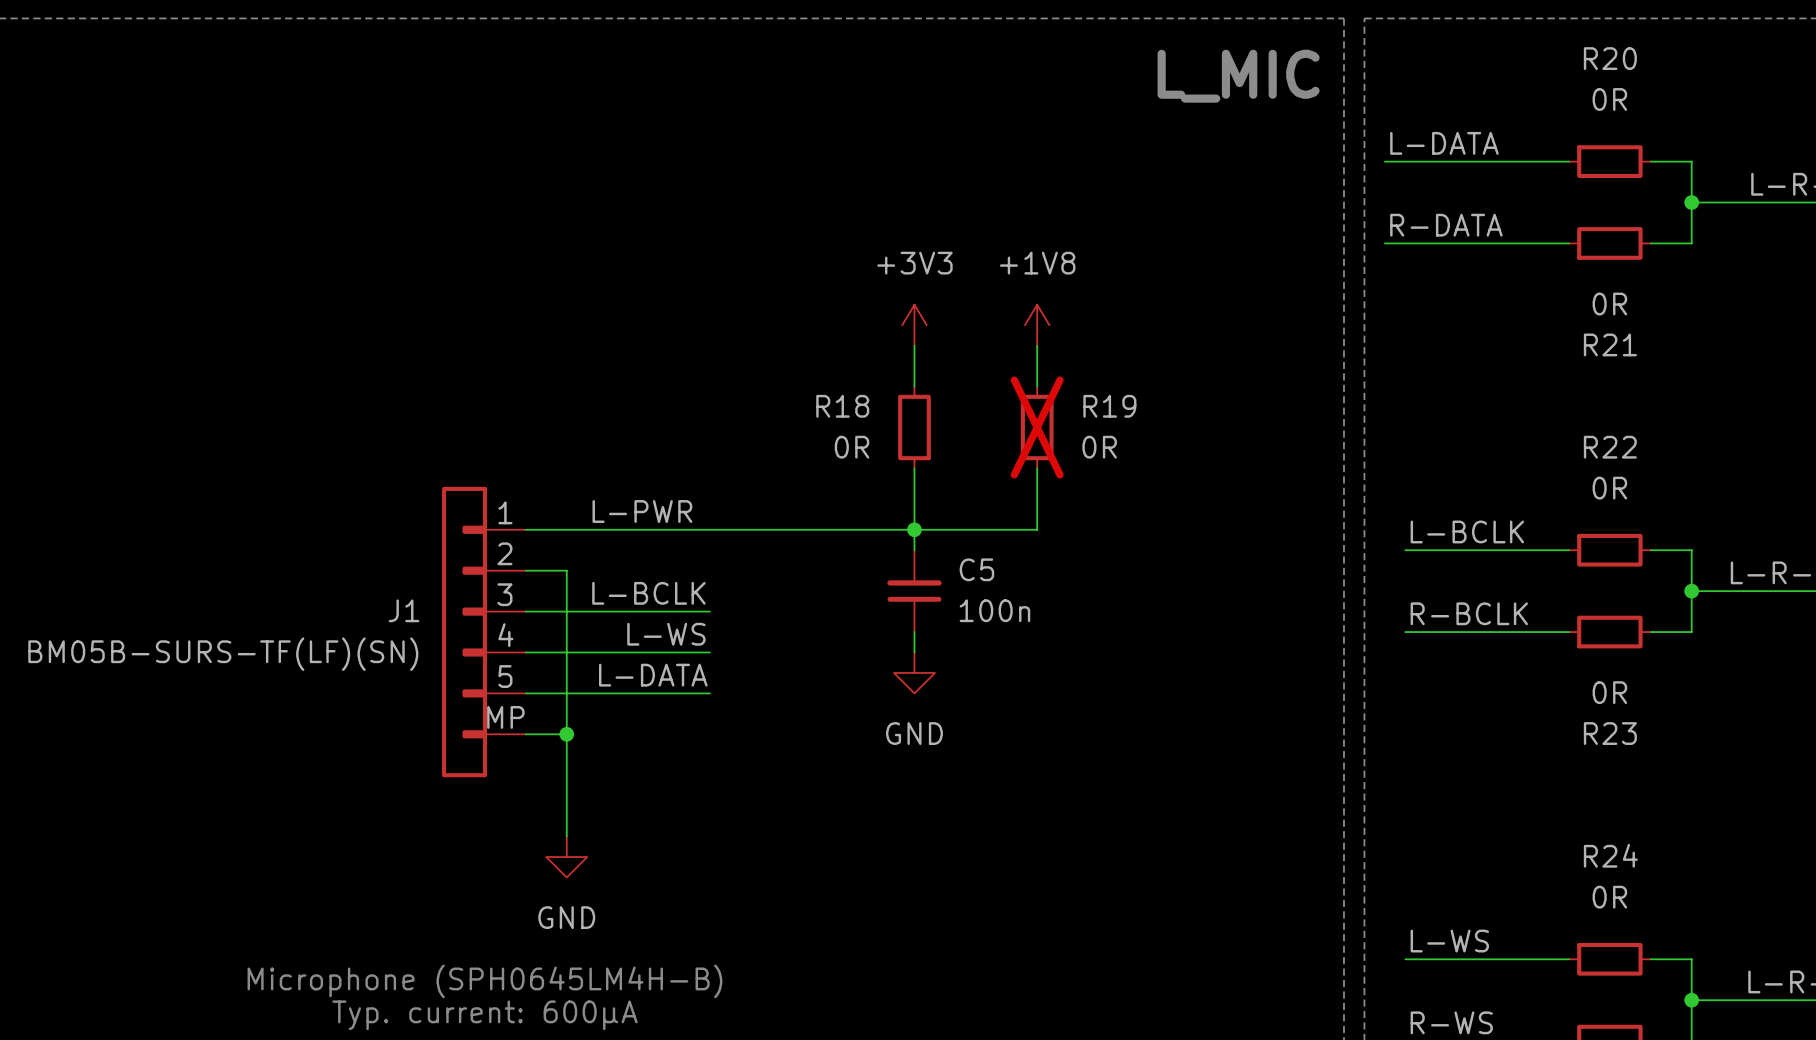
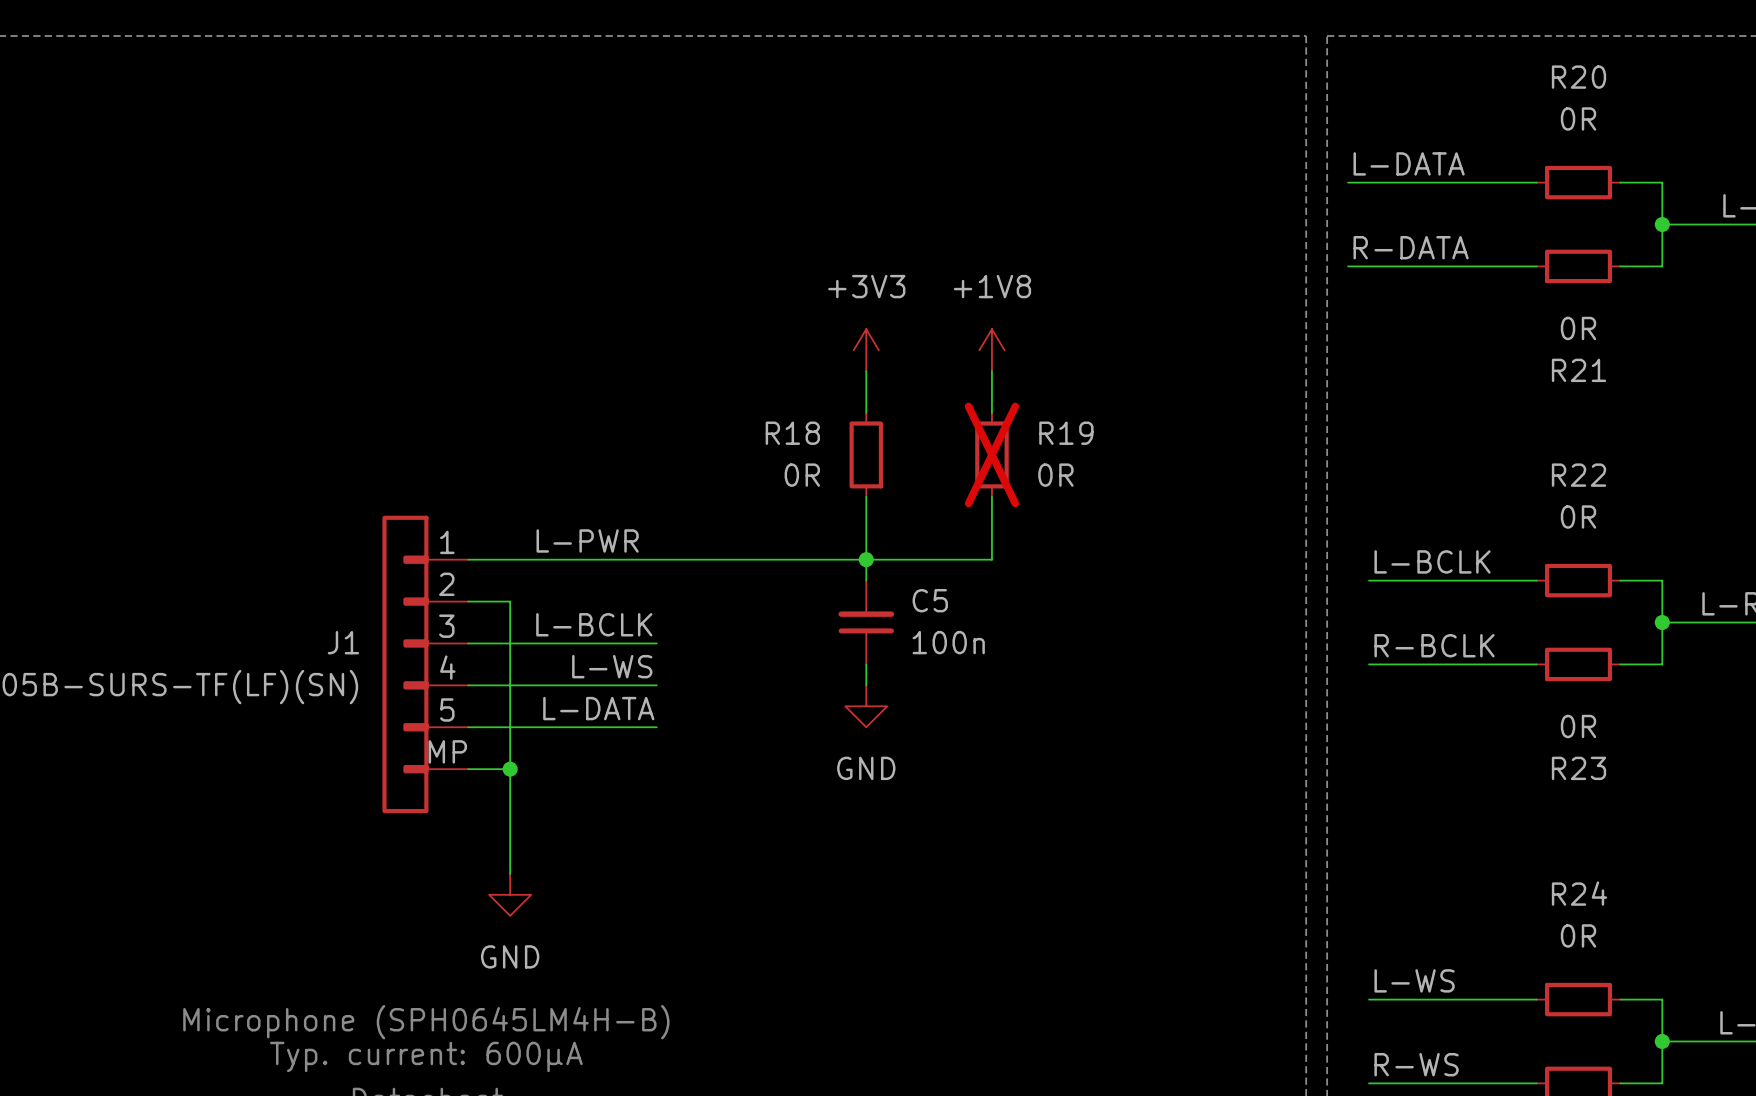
text: L_MIC (1238, 76) -> none

